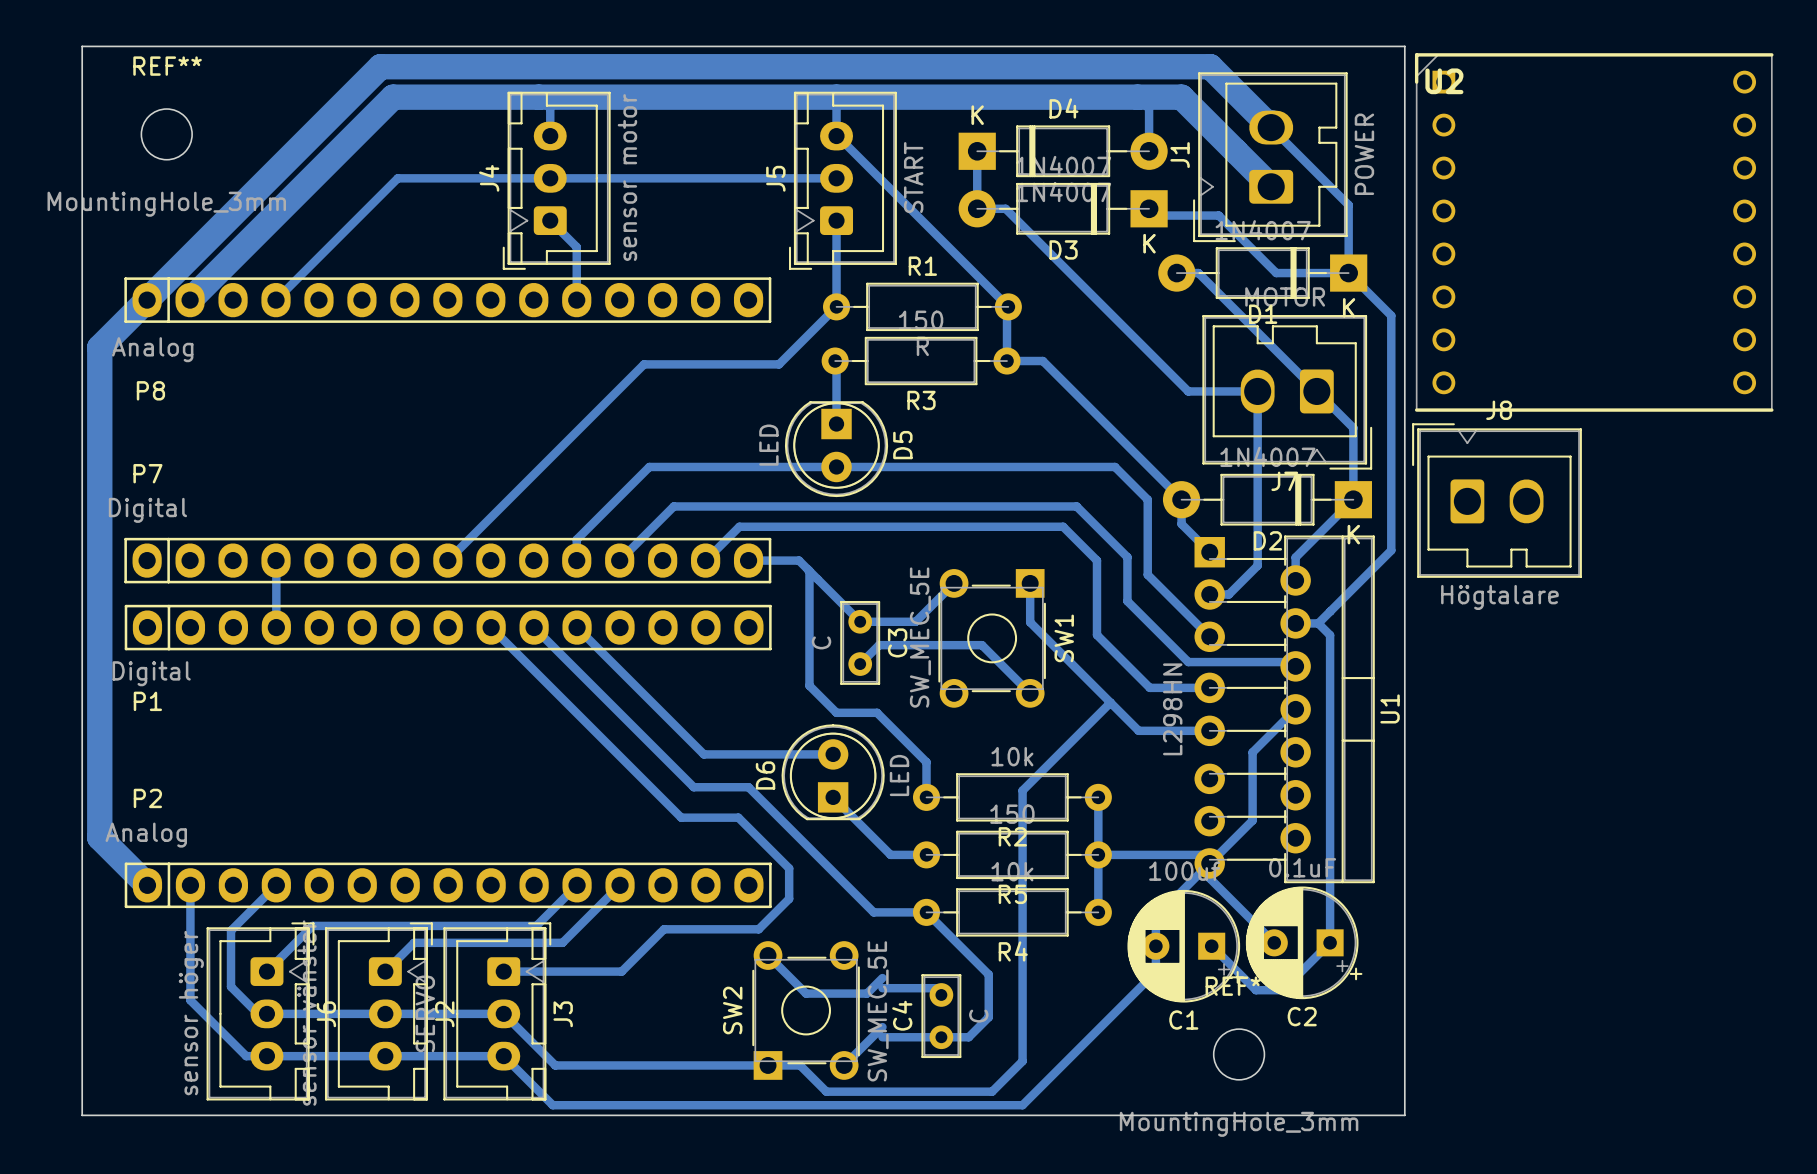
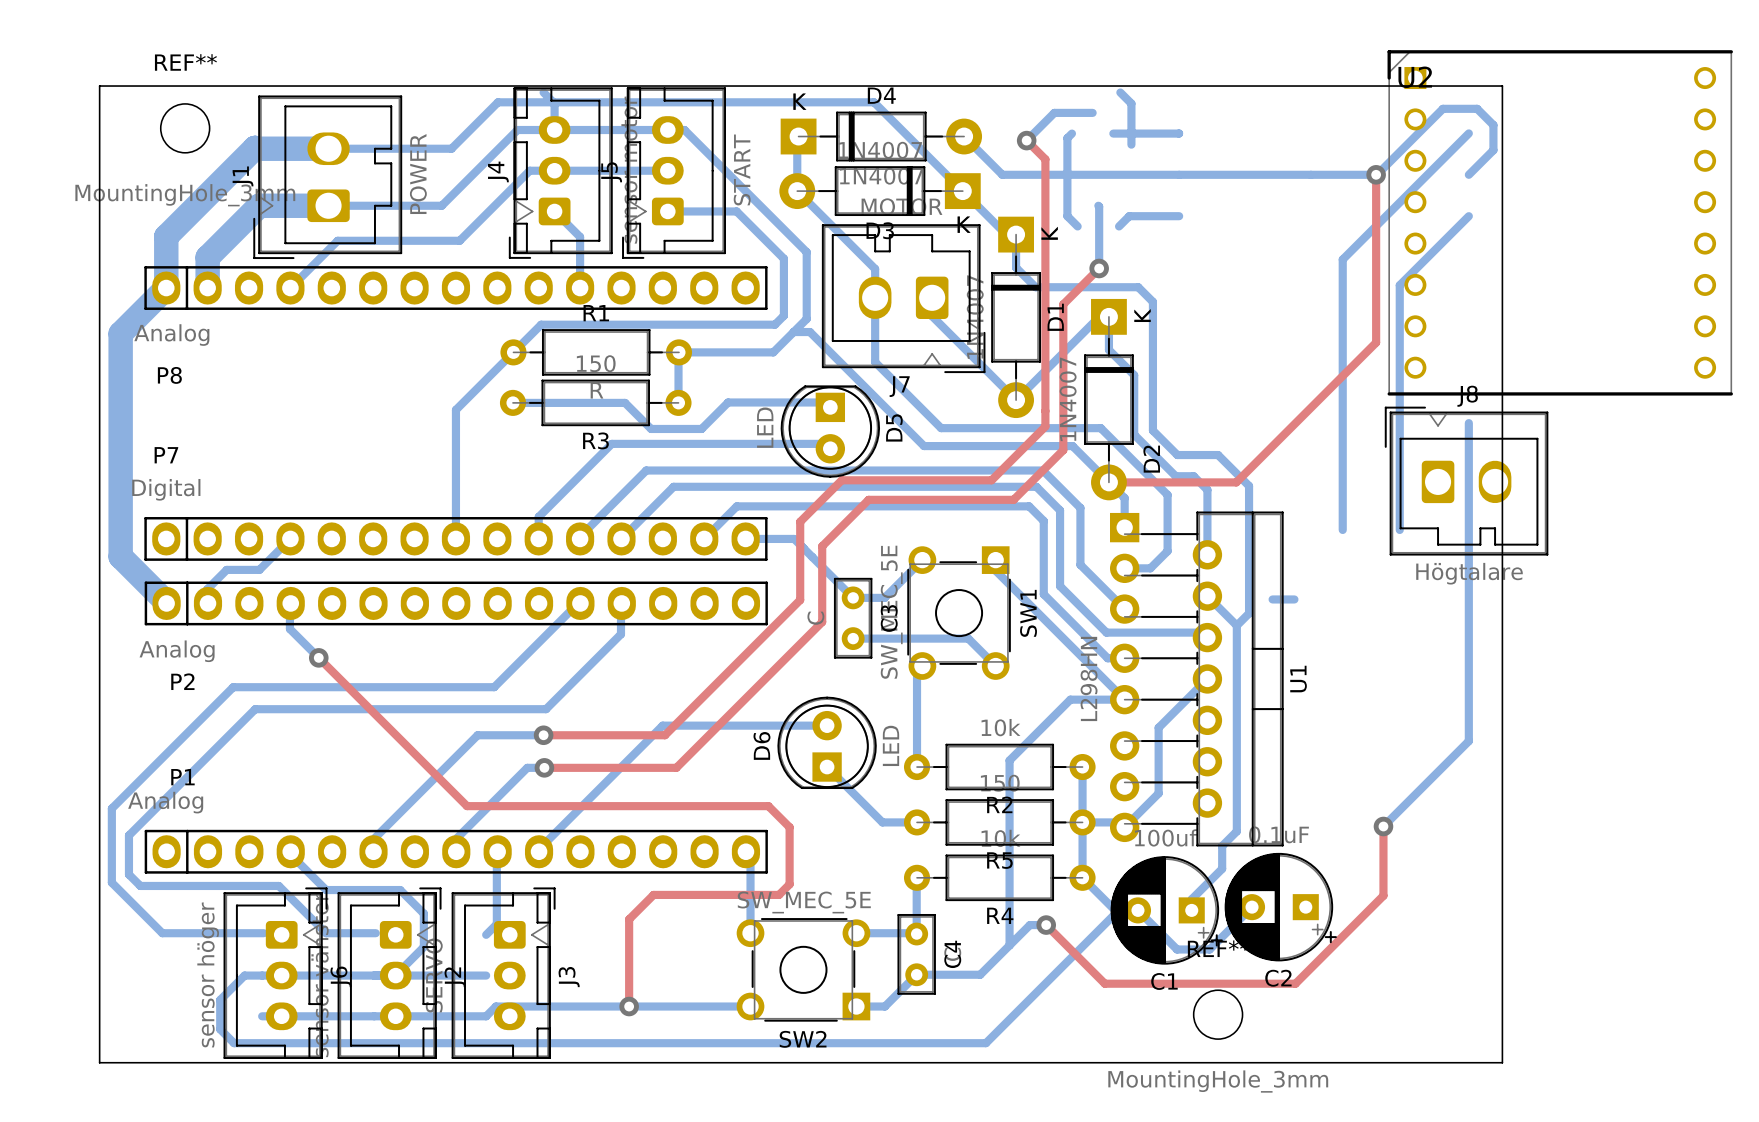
board edge: (82, 46) (1404, 46) (1404, 1115) (82, 1115) (82, 46) -> (99, 86) (99, 1062) (1502, 1062) (1502, 86) (99, 86)
bottom track: (836, 97) (836, 136) (1008, 306) (1007, 361) (1042, 361) (1181, 499) (1181, 524) (1209, 552) -> none
bottom track: none -> (1092, 112) (1054, 112) (1026, 140)
bottom track: (1271, 127) (1210, 66) (380, 66) (147, 300) -> (254, 147) (166, 236) (166, 288)
bottom track: (1271, 127) (1348, 205) (1348, 273) -> none
bottom track: none -> (1071, 133) (1067, 138) (1067, 216) (1077, 226)
bottom track: none -> (1113, 133) (1179, 133)
bottom track: none -> (1468, 133) (1342, 259) (1342, 529)
bottom track: none -> (798, 136) (797, 191) (875, 268) (875, 362) (941, 428) (1100, 428) (1167, 494) (1167, 551) (1150, 568) (1124, 568)
bottom track: none -> (964, 136) (1002, 174) (1376, 174) (1442, 108) (1477, 108) (1493, 125) (1493, 150) (1468, 174)
top track: none -> (1026, 140) (1045, 159) (1045, 426) (991, 480) (841, 480) (800, 521) (800, 600) (664, 735) (543, 735)
via: none -> (1026, 140)
bottom track: (977, 151) (977, 208) (1005, 208) (1188, 391) (1257, 391) (1257, 565) (1228, 594) (1209, 594) -> none
D4 position: (1063, 151) -> (881, 136)
bottom track: none -> (255, 147) (451, 148) (497, 102) (874, 102) (1006, 234) (1016, 234) (1016, 267) (1035, 287) (1138, 287) (1152, 301) (1152, 430) (1177, 455) (1218, 455) (1249, 485) (1249, 613) (1236, 625)
J1 position: (1270, 157) -> (327, 177)
bottom track: (524, 178) (397, 178) (325, 251) -> (529, 170) (459, 240) (337, 240)
bottom track: (667, 178) (836, 178) -> none
J5 position: (842, 180) -> (674, 173)
via: none -> (1376, 174)
top track: none -> (1373, 177) (1376, 174) (1376, 342) (1236, 482) (1108, 482)
bottom track: (1267, 186) (1271, 186) (1181, 97) (393, 97) (190, 300) -> (678, 402) (678, 352) (773, 352) (806, 318) (806, 252) (684, 130) (517, 130) (441, 205) (259, 205) (207, 257) (207, 288)
D3 position: (1063, 208) -> (880, 191)
bottom track: none -> (1098, 205) (1099, 268)
bottom track: (1149, 215) (1218, 215) (1276, 273) (1348, 273) -> none
bottom track: (836, 220) (836, 306) (779, 364) (644, 364) (447, 560) -> (667, 211) (736, 211) (783, 258) (783, 315) (774, 324) (541, 324) (455, 409) (455, 538)
bottom track: none -> (1179, 216) (1129, 216) (1119, 226)
bottom track: none -> (1468, 216) (1399, 285) (1399, 529)
bottom track: (1176, 273) (1198, 273) (1353, 427) (1353, 499) (1295, 557) (1295, 580) -> none
D1 rotation: 0° (1262, 273) -> 90° counterclockwise (1016, 317)
D1 position: (1262, 273) -> (1016, 317)
bottom track: (1348, 273) (1391, 315) (1391, 550) (1318, 623) (1330, 635) (1330, 942) (1282, 990) (1255, 990) (1212, 946) -> (1236, 625) (1236, 831) (1222, 846) (1222, 868) (1191, 899) (1191, 910)
top track: none -> (1099, 268) (1063, 304) (1063, 450) (1013, 499) (868, 499) (822, 546) (822, 622) (676, 767) (544, 767)
via: none -> (1099, 268)
R1 position: (922, 306) -> (596, 352)
bottom track: none -> (932, 297) (932, 316) (1016, 400) (1099, 316) (1108, 316) (1108, 349) (1134, 375) (1134, 434) (1175, 476) (1193, 476) (1207, 489) (1207, 554)
bottom track: none -> (793, 332) (809, 332) (924, 446) (1072, 446) (1124, 498) (1124, 527)
bottom track: (835, 361) (836, 424) -> none
R3 position: (921, 361) -> (595, 402)
J7 position: (1287, 392) -> (903, 298)
bottom track: none -> (831, 402) (728, 402) (701, 428) (651, 428) (625, 402) (512, 402)
bottom track: none -> (1468, 423) (1468, 741) (1383, 826)
bottom track: none -> (831, 443) (611, 443) (538, 516) (538, 538)
D2 rotation: 0° (1267, 499) -> 90° counterclockwise (1108, 399)
D2 position: (1267, 499) -> (1108, 399)
bottom track: (1050, 506) (1076, 506) (1127, 557) (1127, 601) (1188, 662) (1291, 662) (1296, 665) -> (1036, 486) (1060, 510) (1060, 586) (1106, 632) (1202, 632) (1207, 637)
bottom track: (1042, 526) (1063, 526) (1096, 560) (1096, 635) (1149, 687) (1209, 687) -> (1029, 506) (1043, 521) (1043, 594) (1107, 658) (1124, 658)
D2 name position: D2 (1267, 540) -> D2 (1151, 459)
bottom track: (576, 558) (576, 539) (649, 466) (1115, 466) (1147, 499) (1147, 574) (1209, 636) -> (580, 536) (646, 470) (1042, 470) (1080, 507) (1080, 564) (1124, 609)
bottom track: (276, 560) (276, 627) -> (290, 538) (259, 569) (226, 569) (207, 589) (207, 601)
bottom track: (809, 571) (809, 685) (836, 712) (877, 712) (926, 762) -> (922, 666) (917, 671) (917, 733)
bottom track: (99, 579) (99, 837) (147, 885) -> (120, 556) (165, 601)
bottom track: (954, 583) (915, 621) (892, 621) -> (922, 560) (884, 597)
bottom track: (1030, 583) (1030, 622) (1138, 730) (1209, 730) -> none
bottom track: none -> (1207, 596) (1236, 625)
bottom track: none -> (289, 601) (289, 629) (318, 657)
bottom track: none -> (579, 601) (494, 687) (233, 687) (111, 808) (111, 882) (162, 933) (263, 933)
bottom track: none -> (620, 601) (620, 634) (546, 709) (255, 709) (128, 835) (128, 874) (140, 885) (278, 885) (326, 933) (375, 933)
bottom track: (491, 627) (681, 817) (738, 817) (789, 868) (789, 898) (758, 929) (664, 929) (621, 971) (503, 971) -> none
bottom track: (534, 627) (693, 787) (748, 787) (873, 912) (926, 912) (988, 974) (988, 1017) (968, 1037) (882, 1037) -> none
bottom track: (577, 627) (703, 754) -> (538, 850) (662, 725) (702, 725)
SW1 position: (992, 638) -> (959, 613)
bottom track: (860, 664) (879, 645) (981, 645) (1030, 693) -> (853, 638) (968, 638) (995, 666)
P1 value: Digital (151, 673) -> Analog (177, 651)
top track: none -> (318, 657) (467, 806) (768, 806) (789, 827) (789, 884) (779, 894) (653, 894) (629, 919) (629, 1006)
via: none -> (318, 657)
P1 name: P1 (147, 701) -> P2 (182, 681)
bottom track: (1110, 702) (1085, 727) -> (995, 560) (995, 570) (1124, 699) (1070, 699)
bottom track: none -> (1207, 678) (1158, 727) (1158, 793) (1124, 827) (1119, 822)
U1 position: (1284, 709) -> (1196, 678)
bottom track: (1295, 709) (1252, 752) (1252, 820) (1155, 917) (1155, 971) (1022, 1105) (552, 1105) (503, 1056) (479, 1056) -> (750, 1006) (495, 1006) (486, 1016)
bottom track: none -> (543, 735) (477, 735) (372, 840) (372, 850)
via: none -> (543, 735)
P2 name: P2 (147, 798) -> P1 (182, 777)
bottom track: none -> (544, 767) (527, 767) (455, 839) (455, 850)
via: none -> (544, 767)
bottom track: (1136, 854) (1201, 854) (1209, 863) (1209, 878) (1274, 942) -> (1082, 877) (1115, 910) (1137, 910) (1177, 949) (1209, 949) (1252, 907)
top track: none -> (1383, 826) (1383, 895) (1295, 983) (1104, 983) (1046, 925)
via: none -> (1383, 826)
bottom track: none -> (289, 850) (289, 853) (326, 890) (400, 890) (423, 913) (423, 947) (395, 975)
bottom track: none -> (496, 850) (496, 924) (486, 934)
bottom track: none -> (745, 850) (750, 855) (750, 933)
bottom track: (190, 885) (190, 1000) (246, 1056) -> none
bottom track: (276, 885) (231, 930) (231, 986) (258, 1013) -> (1118, 910) (985, 1043) (234, 1043) (220, 1029) (220, 1000) (244, 975) (273, 975)
bottom track: (577, 885) (536, 925) (312, 925) (266, 971) -> none
bottom track: (620, 885) (562, 942) (414, 942) (385, 971) -> none
bottom track: none -> (917, 877) (916, 934) (856, 933)
bottom track: (768, 955) (806, 993) (866, 993) (882, 978) -> none
bottom track: none -> (1046, 925) (1029, 925) (980, 974) (916, 974) (884, 1006) (856, 1006)
via: none -> (1046, 925)
bottom track: (1022, 982) (1022, 1061) (992, 1091) (826, 1091) (800, 1065) (555, 1065) (503, 1013) (479, 1013) -> none
bottom track: (882, 988) (941, 988) -> none
SW2 rotation: 0° (806, 1010) -> 90° counterclockwise (803, 969)
C4 name position: C4 (902, 1015) -> C4 (952, 954)
C4 position: (941, 1016) -> (916, 954)
bottom track: (882, 1027) (844, 1065) -> none
via: none -> (629, 1006)

